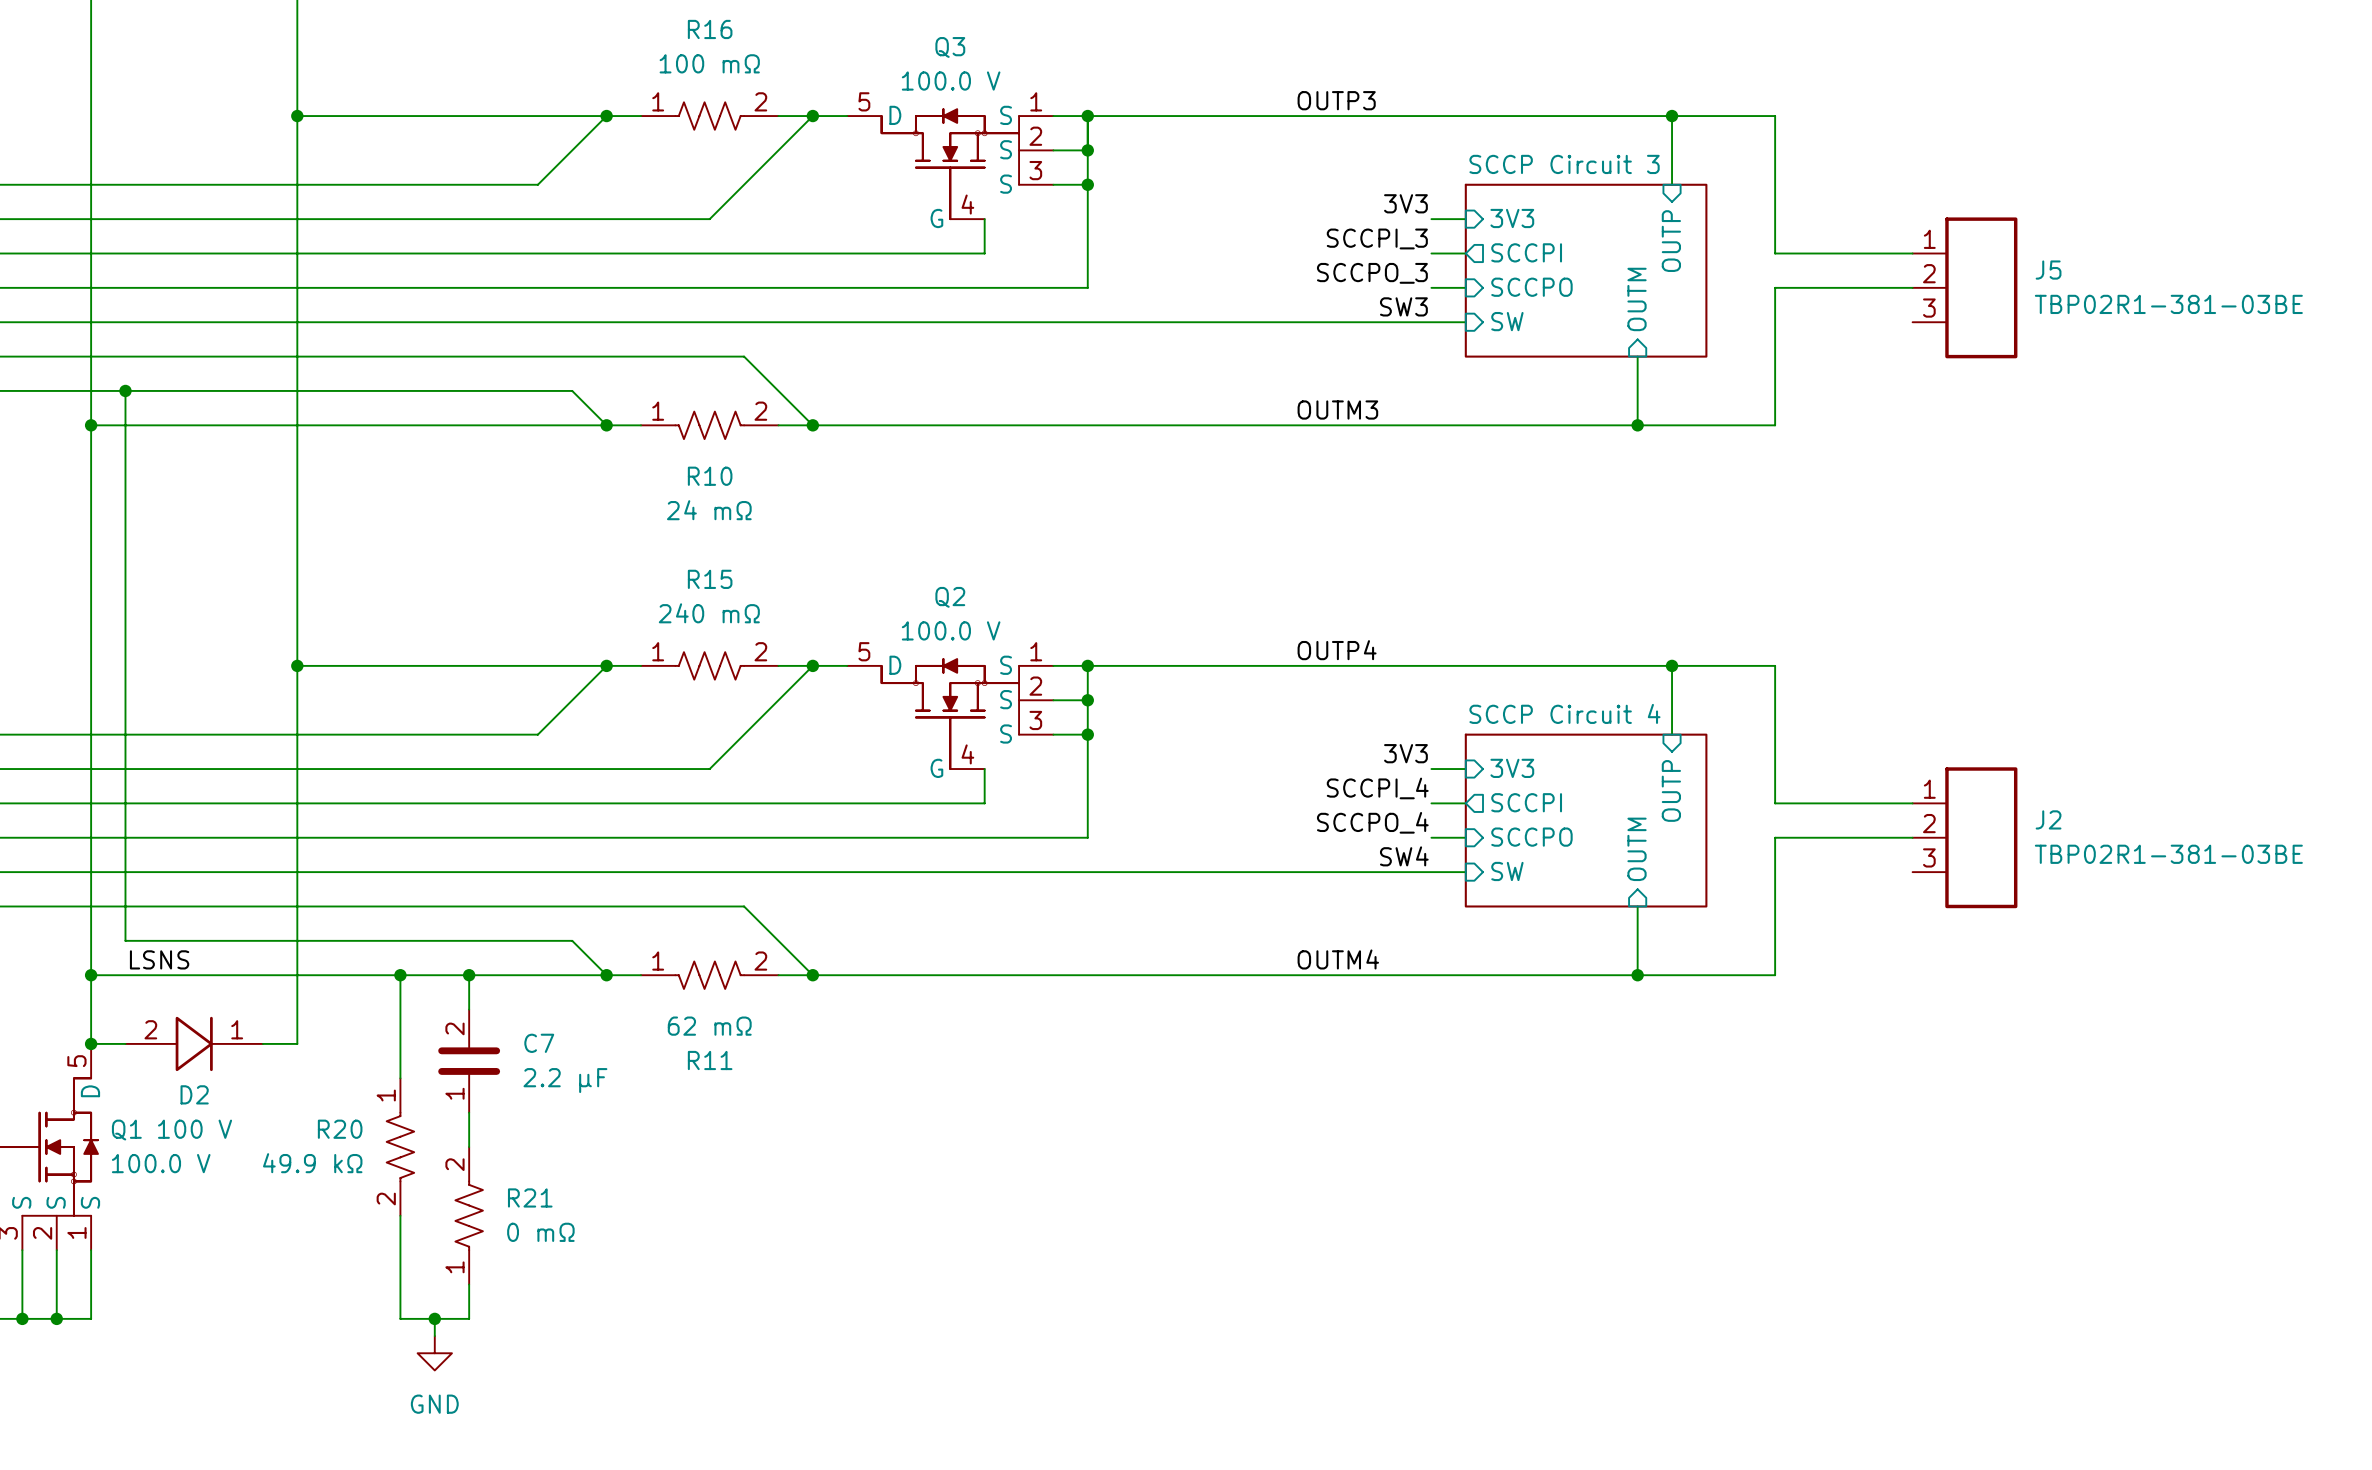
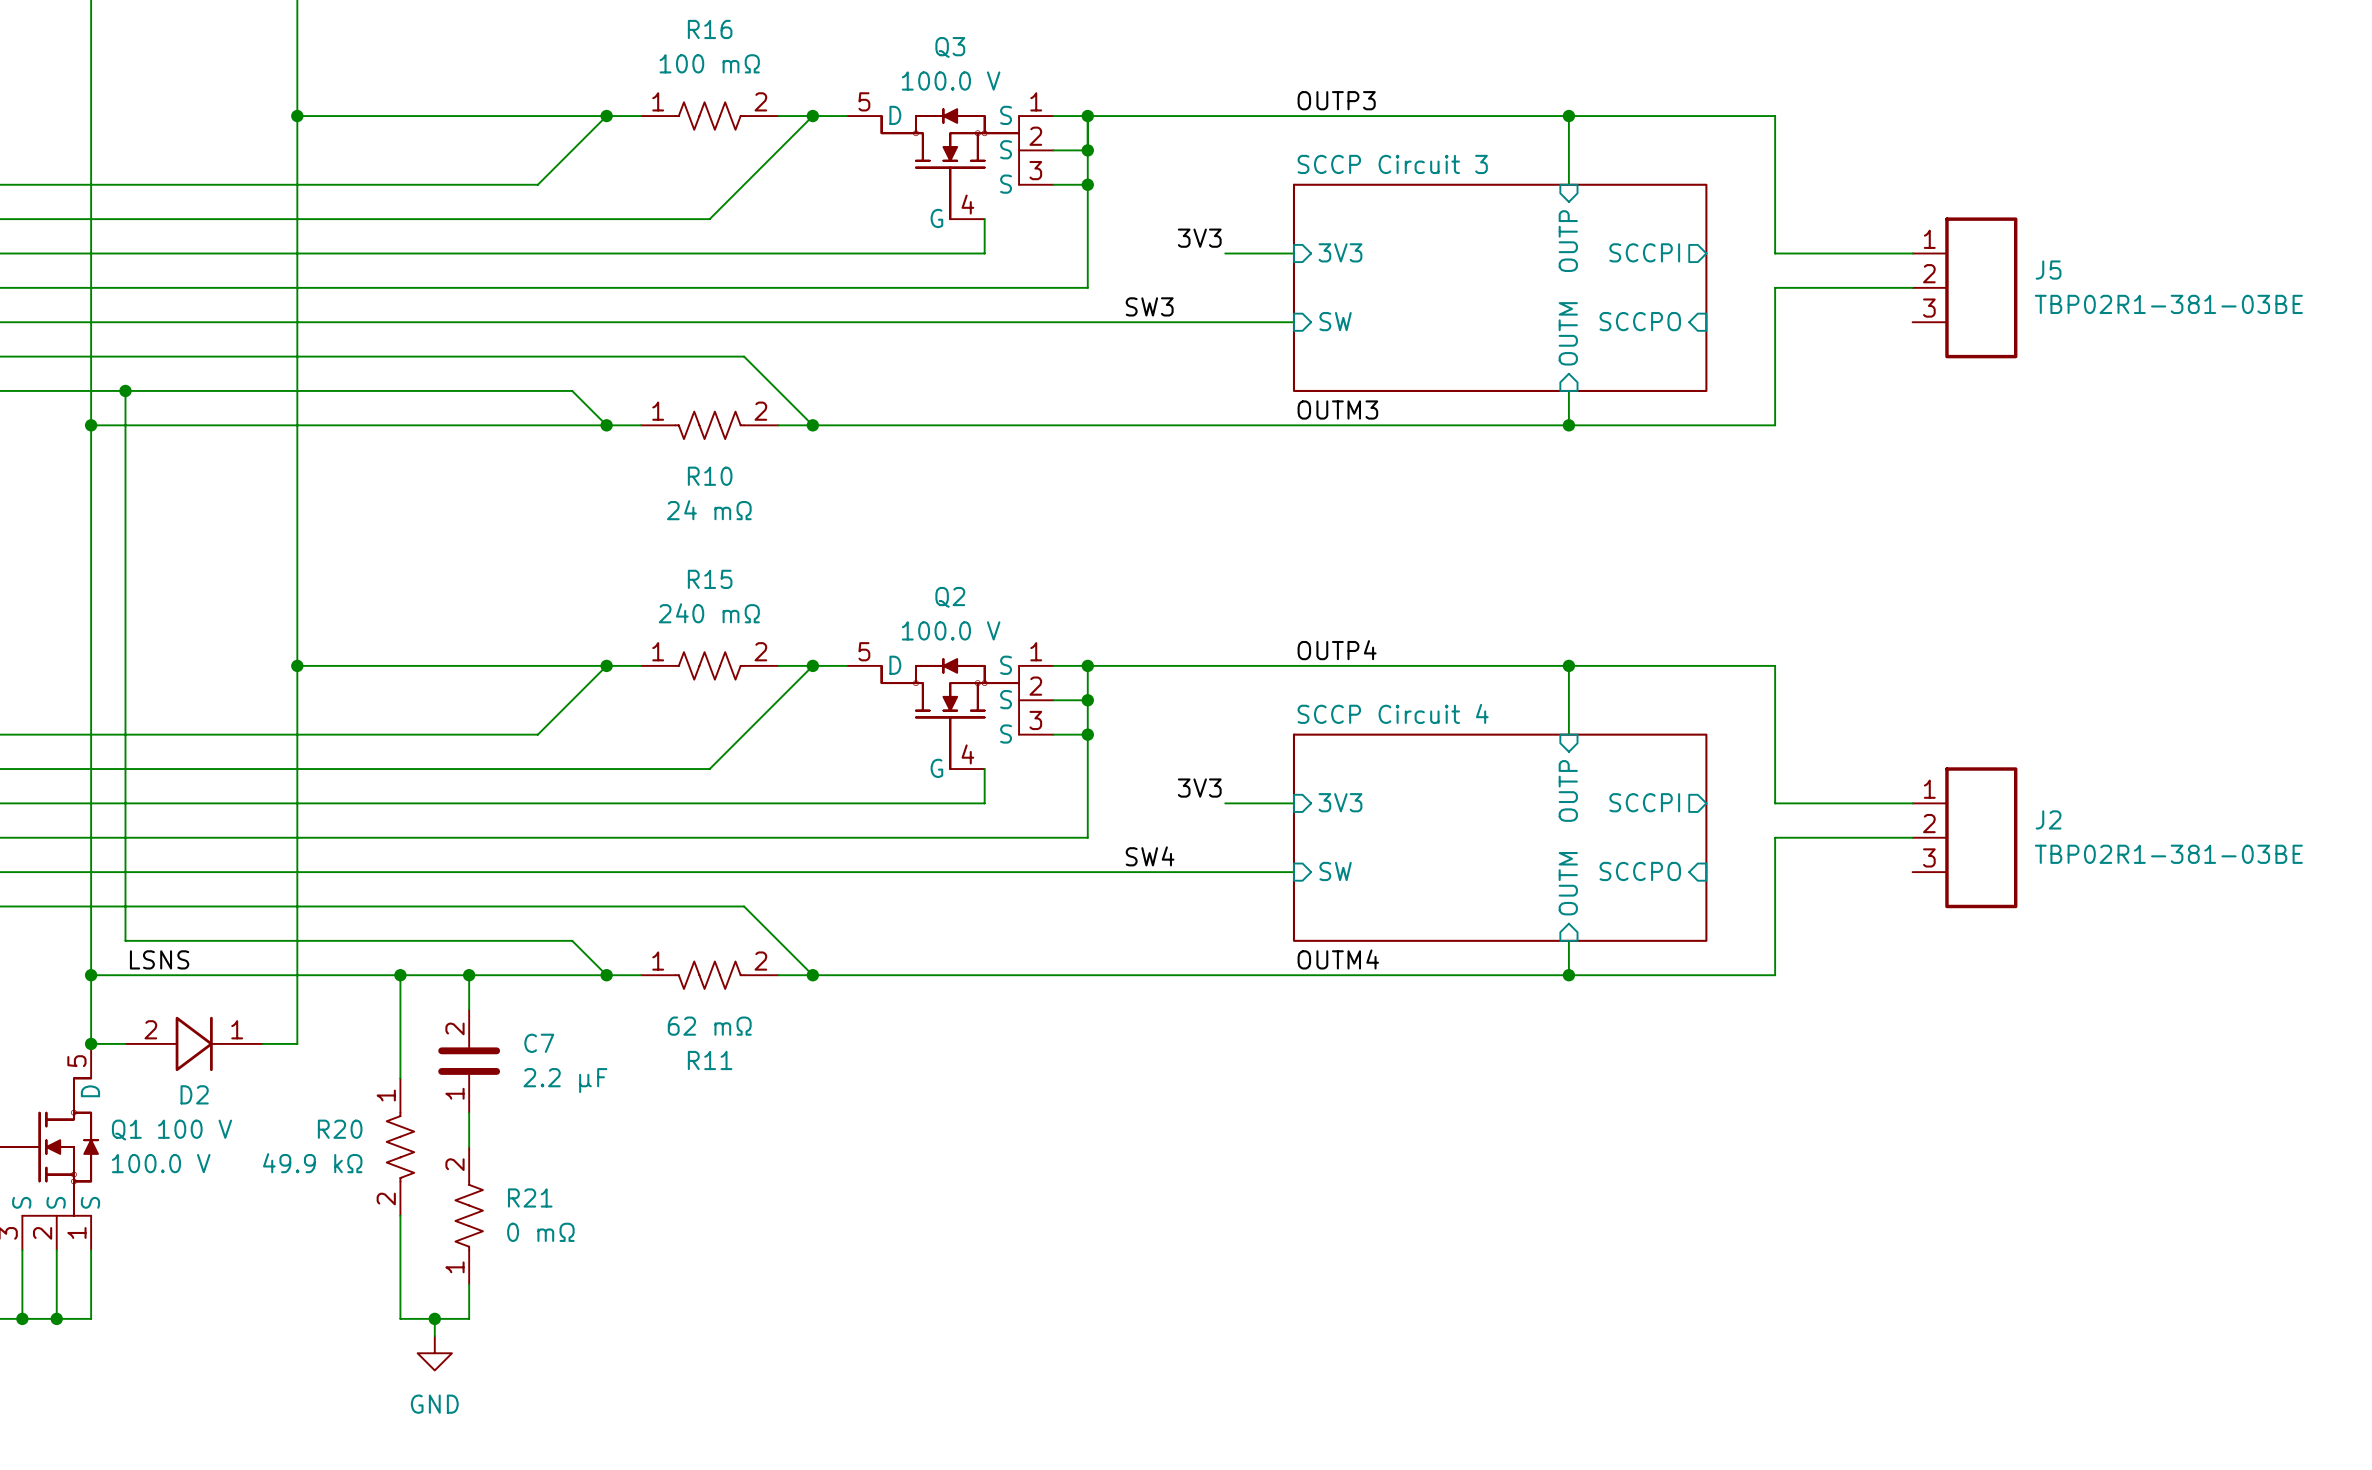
junction: none -> (1568, 116)
wire: (1672, 116) (1672, 184) -> (1568, 116) (1568, 184)
junction: (1672, 116) -> none
sheet SCCP Circuit 3 name position: SCCP Circuit 3 (1564, 164) -> SCCP Circuit 3 (1392, 164)
sheet SCCP Circuit 3 shape: [1464, 183, 1708, 358] -> [1292, 183, 1708, 393]
label position: 3V3 (1405, 203) -> 3V3 (1199, 238)
sheet pin position: 3V3 (1512, 218) -> 3V3 (1340, 252)
wire: (1431, 219) (1465, 219) -> none
label: SCCPI_3 (1377, 238) -> none
sheet pin position: OUTP (1671, 241) -> OUTP (1568, 241)
sheet pin rotation: 0° (1526, 252) -> 180° (1644, 252)
sheet pin position: SCCPI (1526, 252) -> SCCPI (1644, 252)
wire: none -> (1225, 253) (1293, 253)
wire: (1431, 253) (1465, 253) -> none
label: SCCPO_3 (1372, 273) -> none
wire: (1431, 287) (1465, 287) -> none
sheet pin rotation: 0° (1531, 287) -> 180° (1640, 321)
sheet pin position: SCCPO (1531, 287) -> SCCPO (1640, 321)
sheet pin position: OUTM (1637, 299) -> OUTM (1568, 333)
label position: SW3 (1403, 306) -> SW3 (1149, 306)
sheet pin position: SW (1507, 321) -> SW (1335, 321)
wire: (1293, 322) (1465, 322) -> none
wire: (1637, 356) (1637, 425) -> none
wire: none -> (1568, 390) (1568, 425)
junction position: (1637, 425) -> (1568, 425)
junction: none -> (1568, 665)
wire: (1672, 665) (1672, 734) -> (1568, 665) (1568, 734)
junction: (1672, 665) -> none
sheet SCCP Circuit 4 name position: SCCP Circuit 4 (1564, 713) -> SCCP Circuit 4 (1393, 713)
sheet SCCP Circuit 4 shape: [1464, 733, 1708, 908] -> [1292, 733, 1708, 942]
label position: 3V3 (1405, 753) -> 3V3 (1199, 788)
sheet pin position: 3V3 (1512, 768) -> 3V3 (1340, 802)
wire: (1431, 769) (1465, 769) -> none
label: SCCPI_4 (1377, 788) -> none
sheet pin position: OUTP (1671, 790) -> OUTP (1568, 790)
sheet pin rotation: 0° (1526, 802) -> 180° (1644, 802)
sheet pin position: SCCPI (1526, 802) -> SCCPI (1644, 802)
wire: none -> (1225, 803) (1293, 803)
wire: (1431, 803) (1465, 803) -> none
label: SCCPO_4 (1372, 822) -> none
wire: (1431, 837) (1465, 837) -> none
sheet pin rotation: 0° (1531, 837) -> 180° (1640, 871)
sheet pin position: SCCPO (1531, 837) -> SCCPO (1640, 871)
sheet pin position: OUTM (1637, 849) -> OUTM (1568, 883)
label position: SW4 (1404, 856) -> SW4 (1150, 856)
sheet pin position: SW (1507, 871) -> SW (1335, 871)
wire: (1293, 872) (1465, 872) -> none
wire: (1637, 906) (1637, 975) -> none
wire: none -> (1568, 940) (1568, 975)
junction position: (1637, 975) -> (1568, 975)

